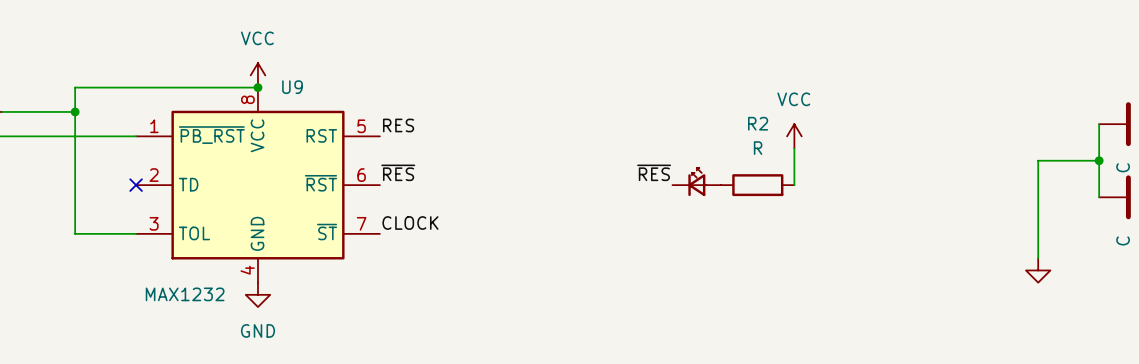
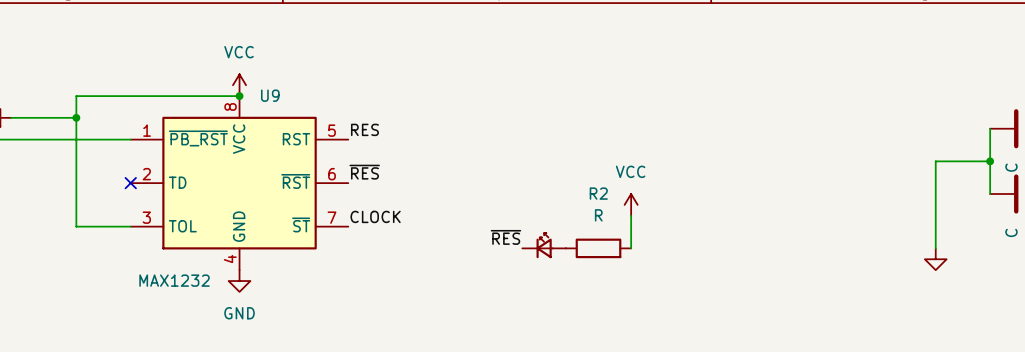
power symbol position: VCC (794, 136) -> VCC (631, 204)
wire: (794, 148) (794, 185) -> (631, 215) (631, 248)
label position: ~{RES} (654, 172) -> ~{RES} (505, 237)
part position: (696, 182) -> (544, 245)
R2 position: (757, 185) -> (598, 248)

